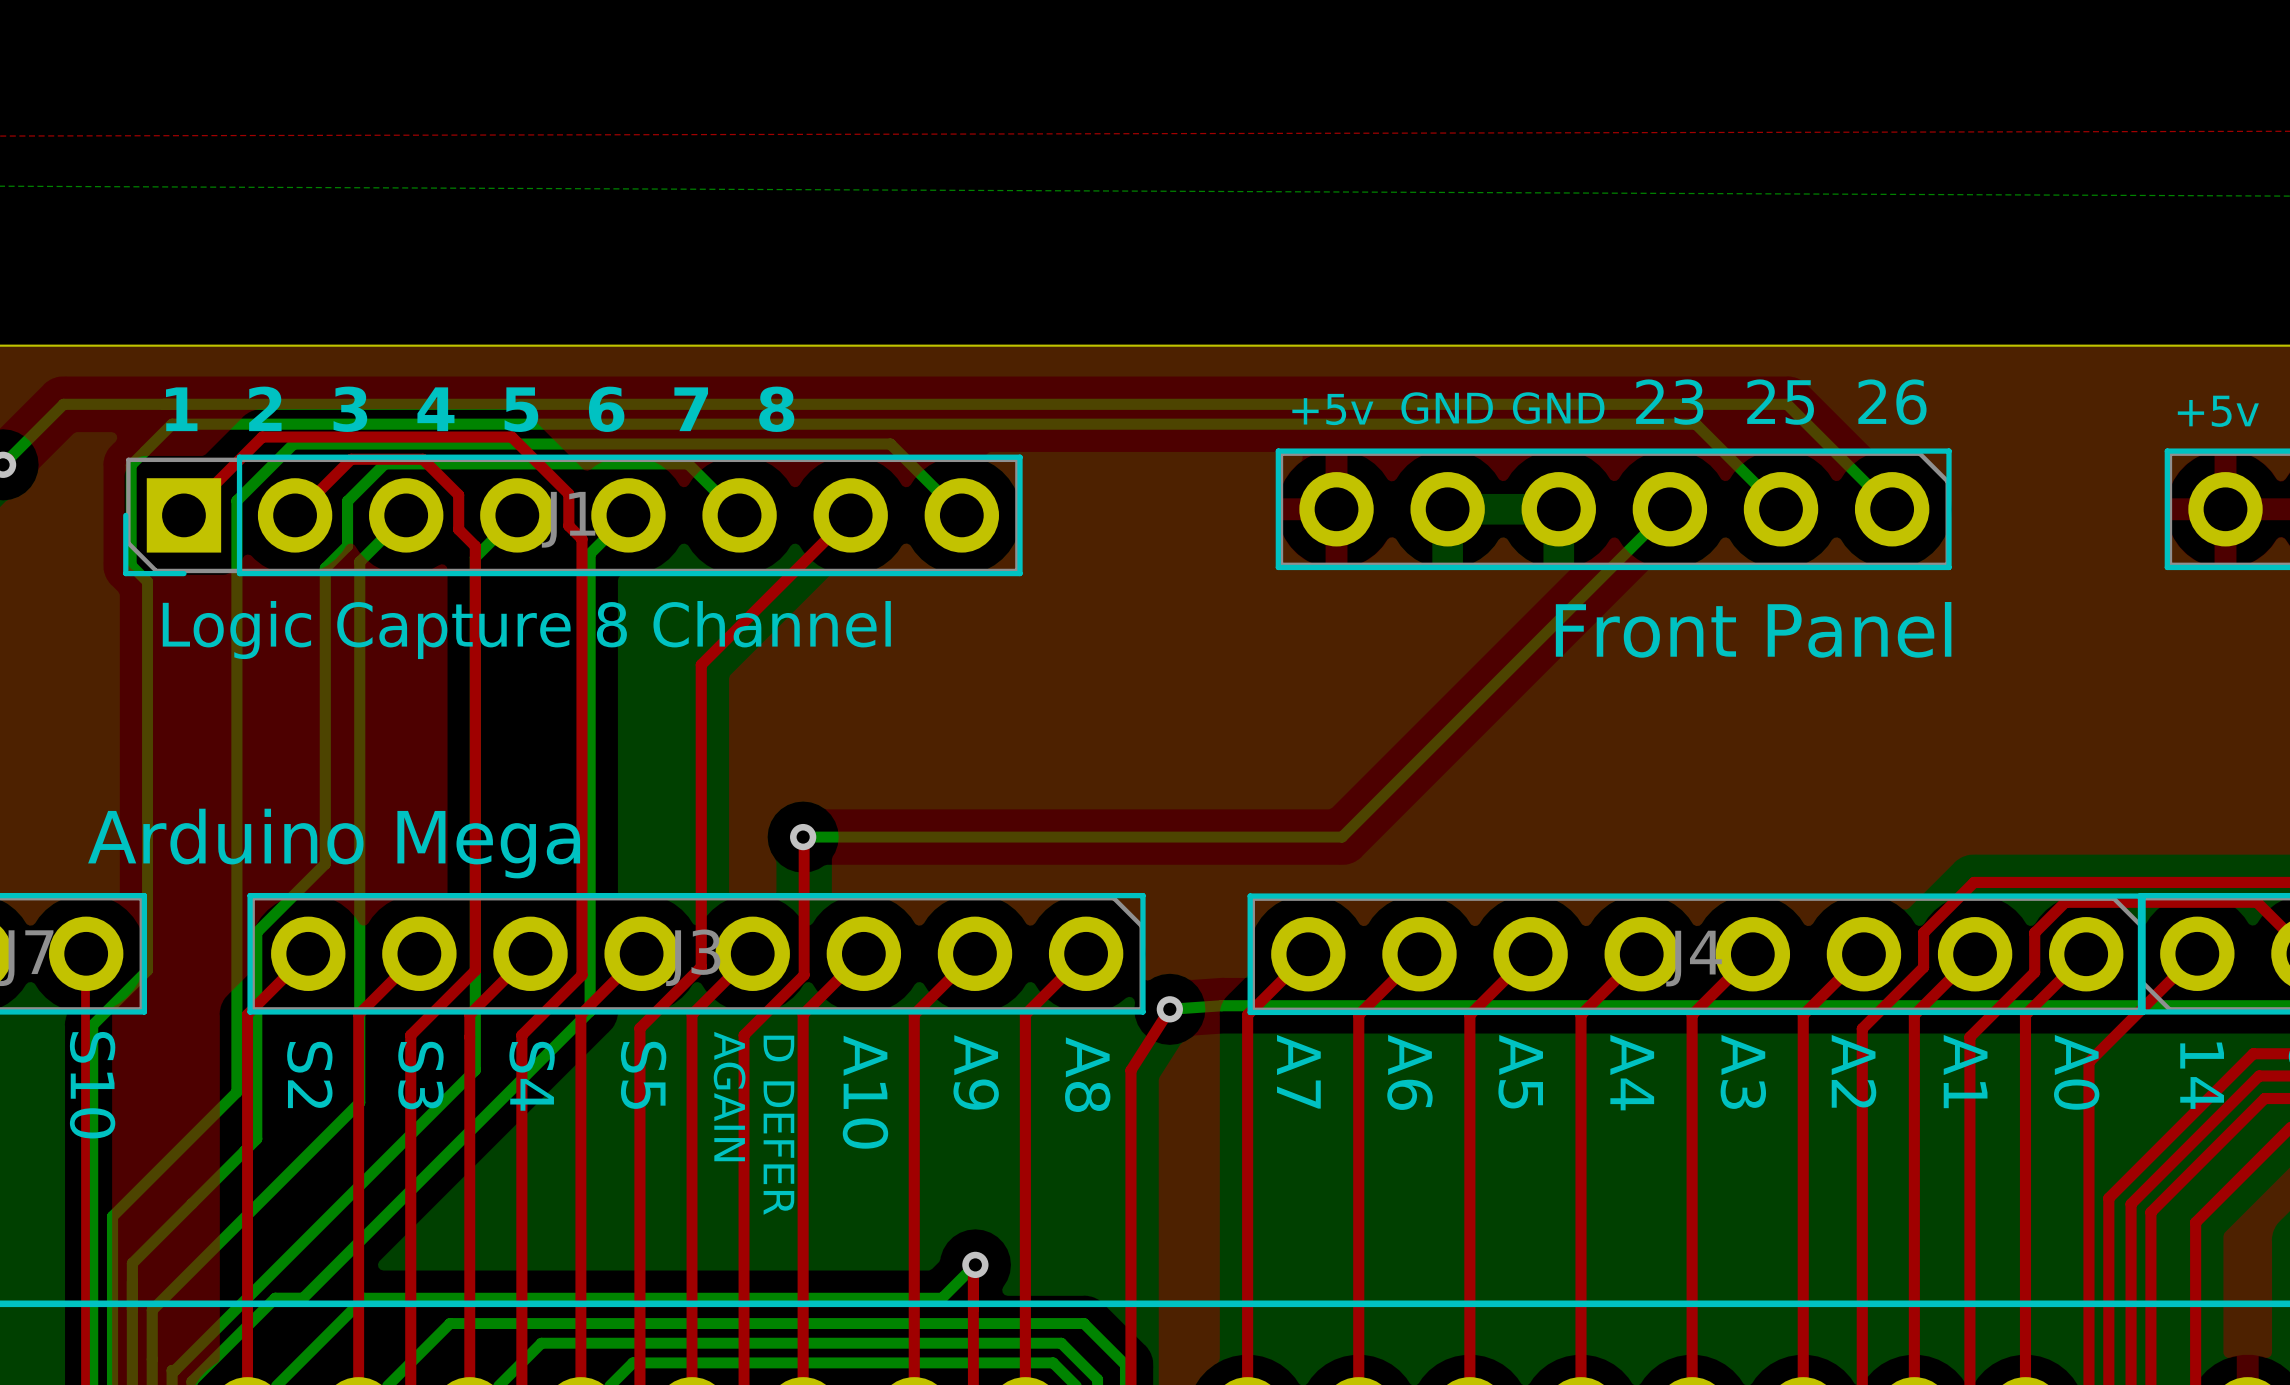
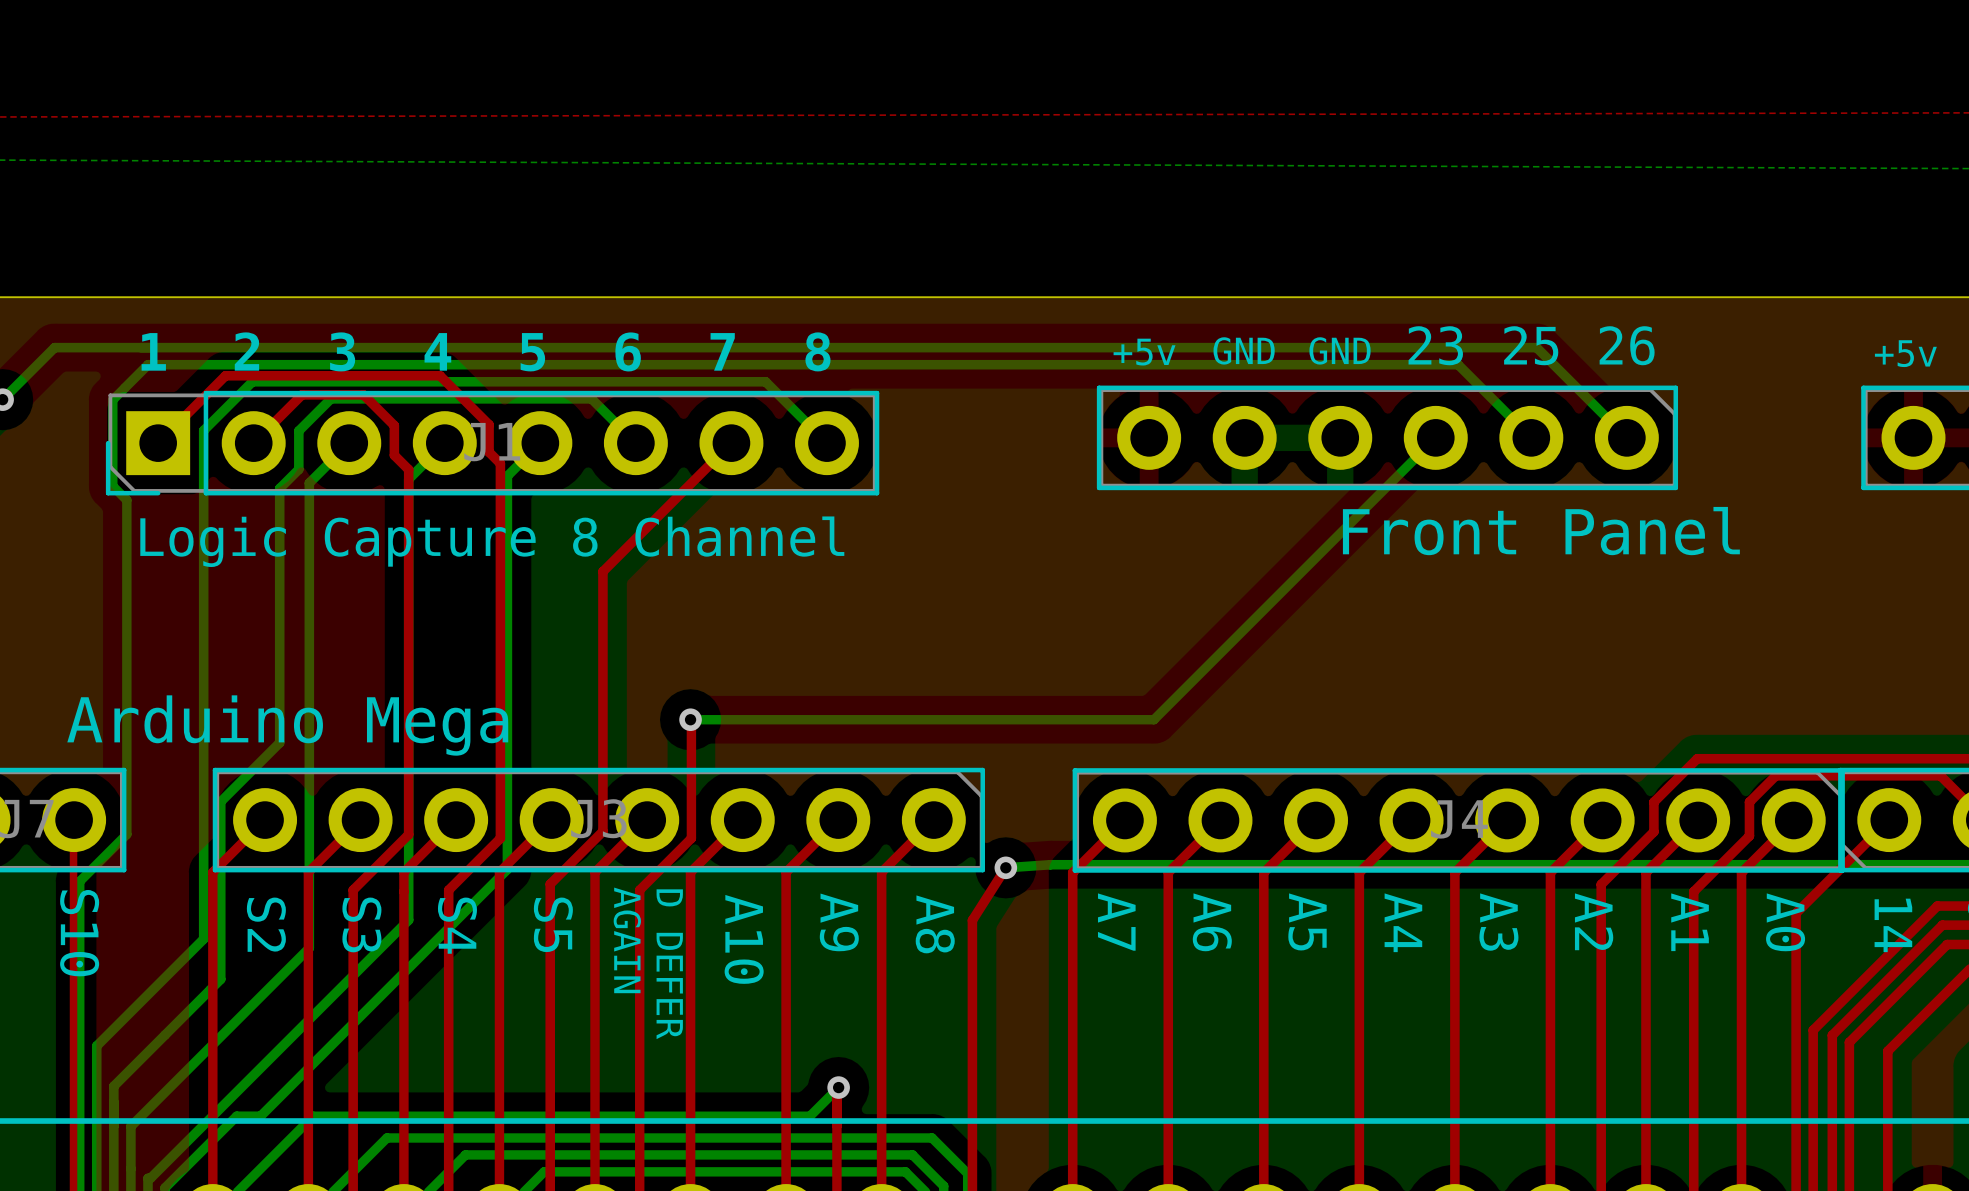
text position: Front Panel (1753, 629) -> Front Panel (1541, 531)

